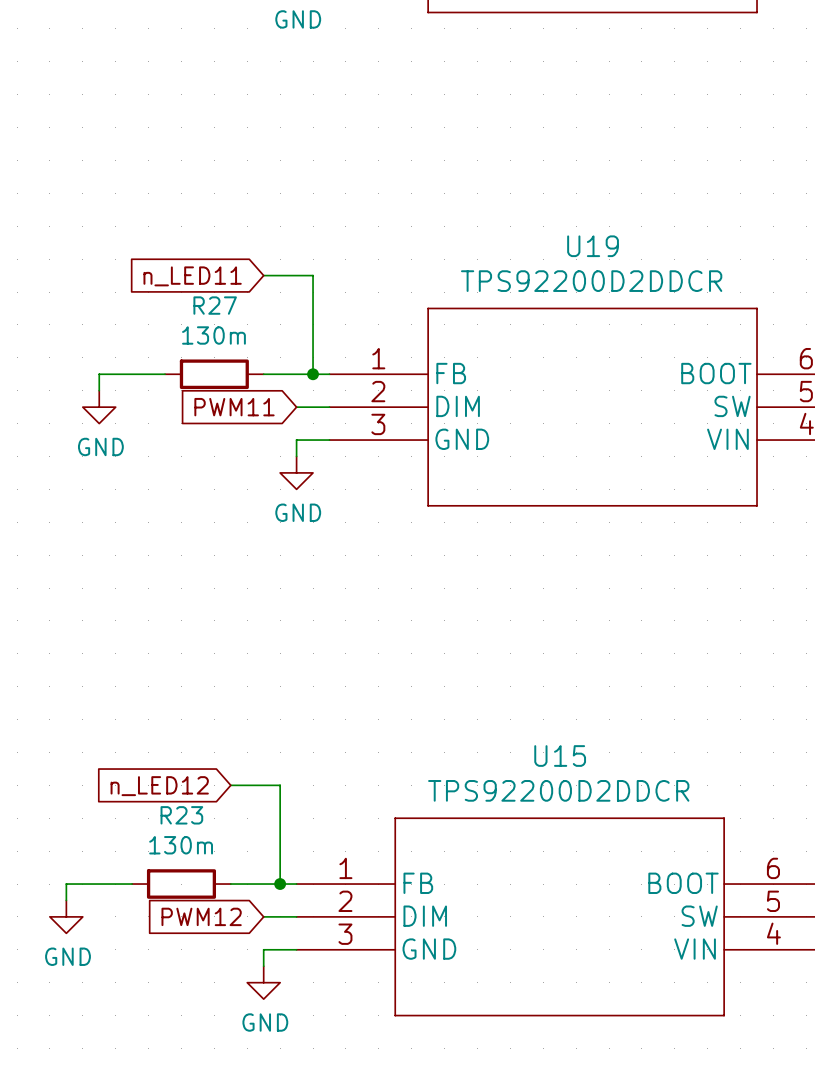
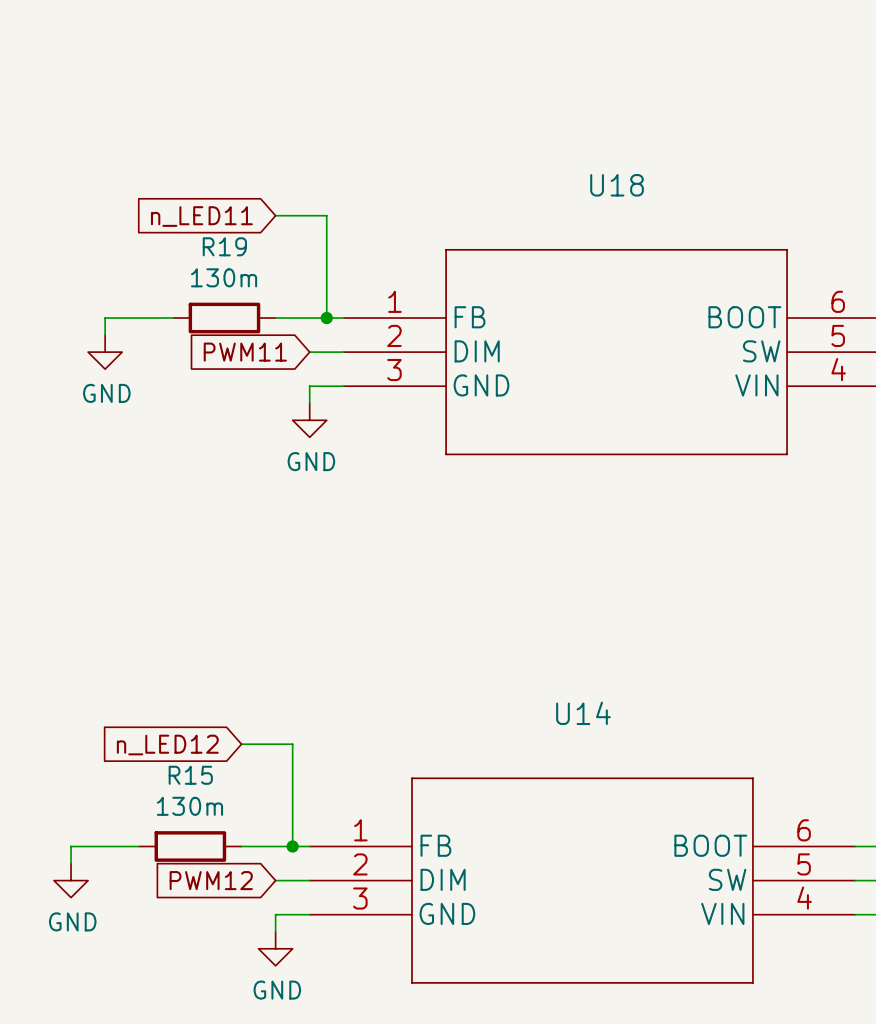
U19 name: U19 (593, 246) -> U18 (617, 185)
U19 value: TPS92200D2DDCR (591, 281) -> none
R27 name: R27 (215, 305) -> R19 (224, 246)
U15 name: U15 (560, 756) -> U14 (583, 713)
U15 value: TPS92200D2DDCR (558, 790) -> none
R23 name: R23 (181, 815) -> R15 (190, 775)

